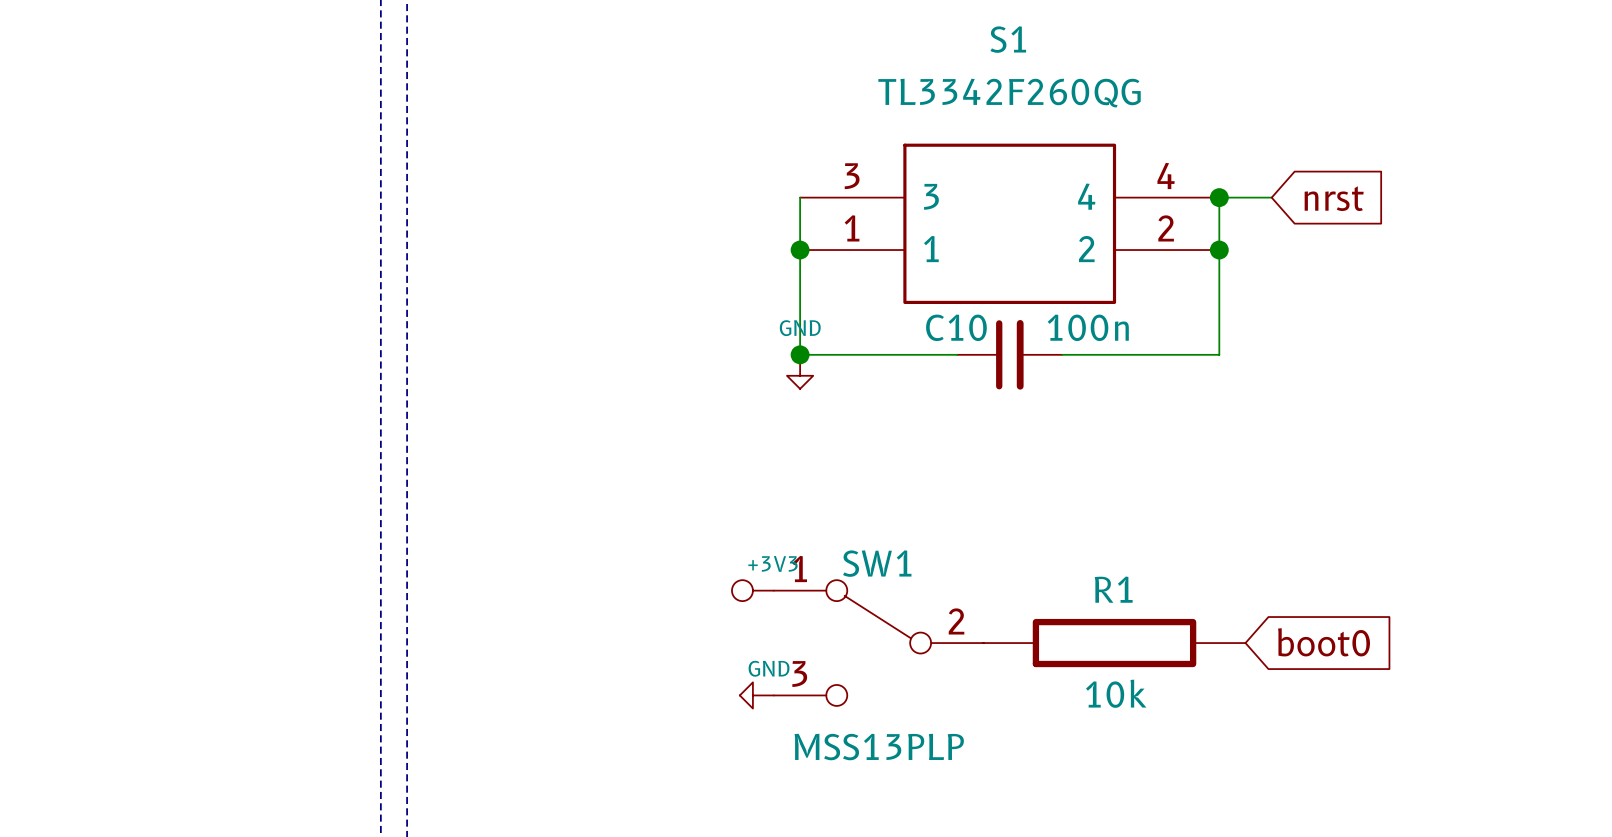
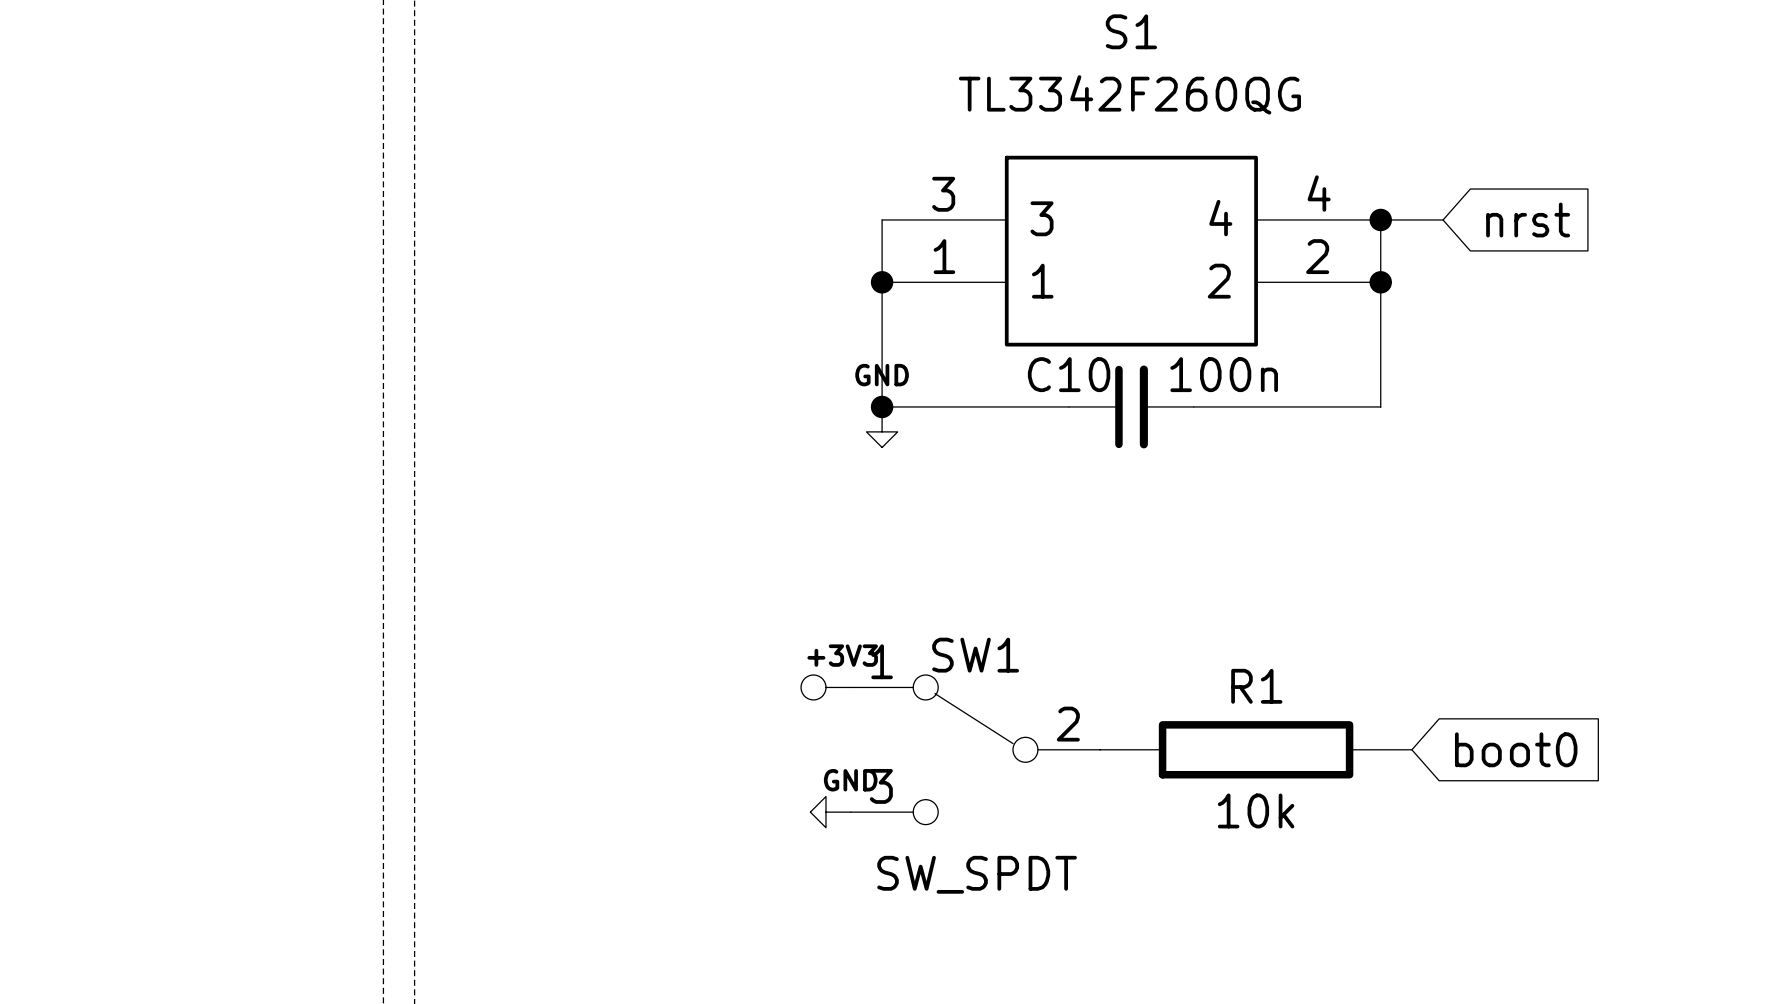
SW1 value: MSS13PLP (879, 747) -> SW_SPDT (977, 874)

